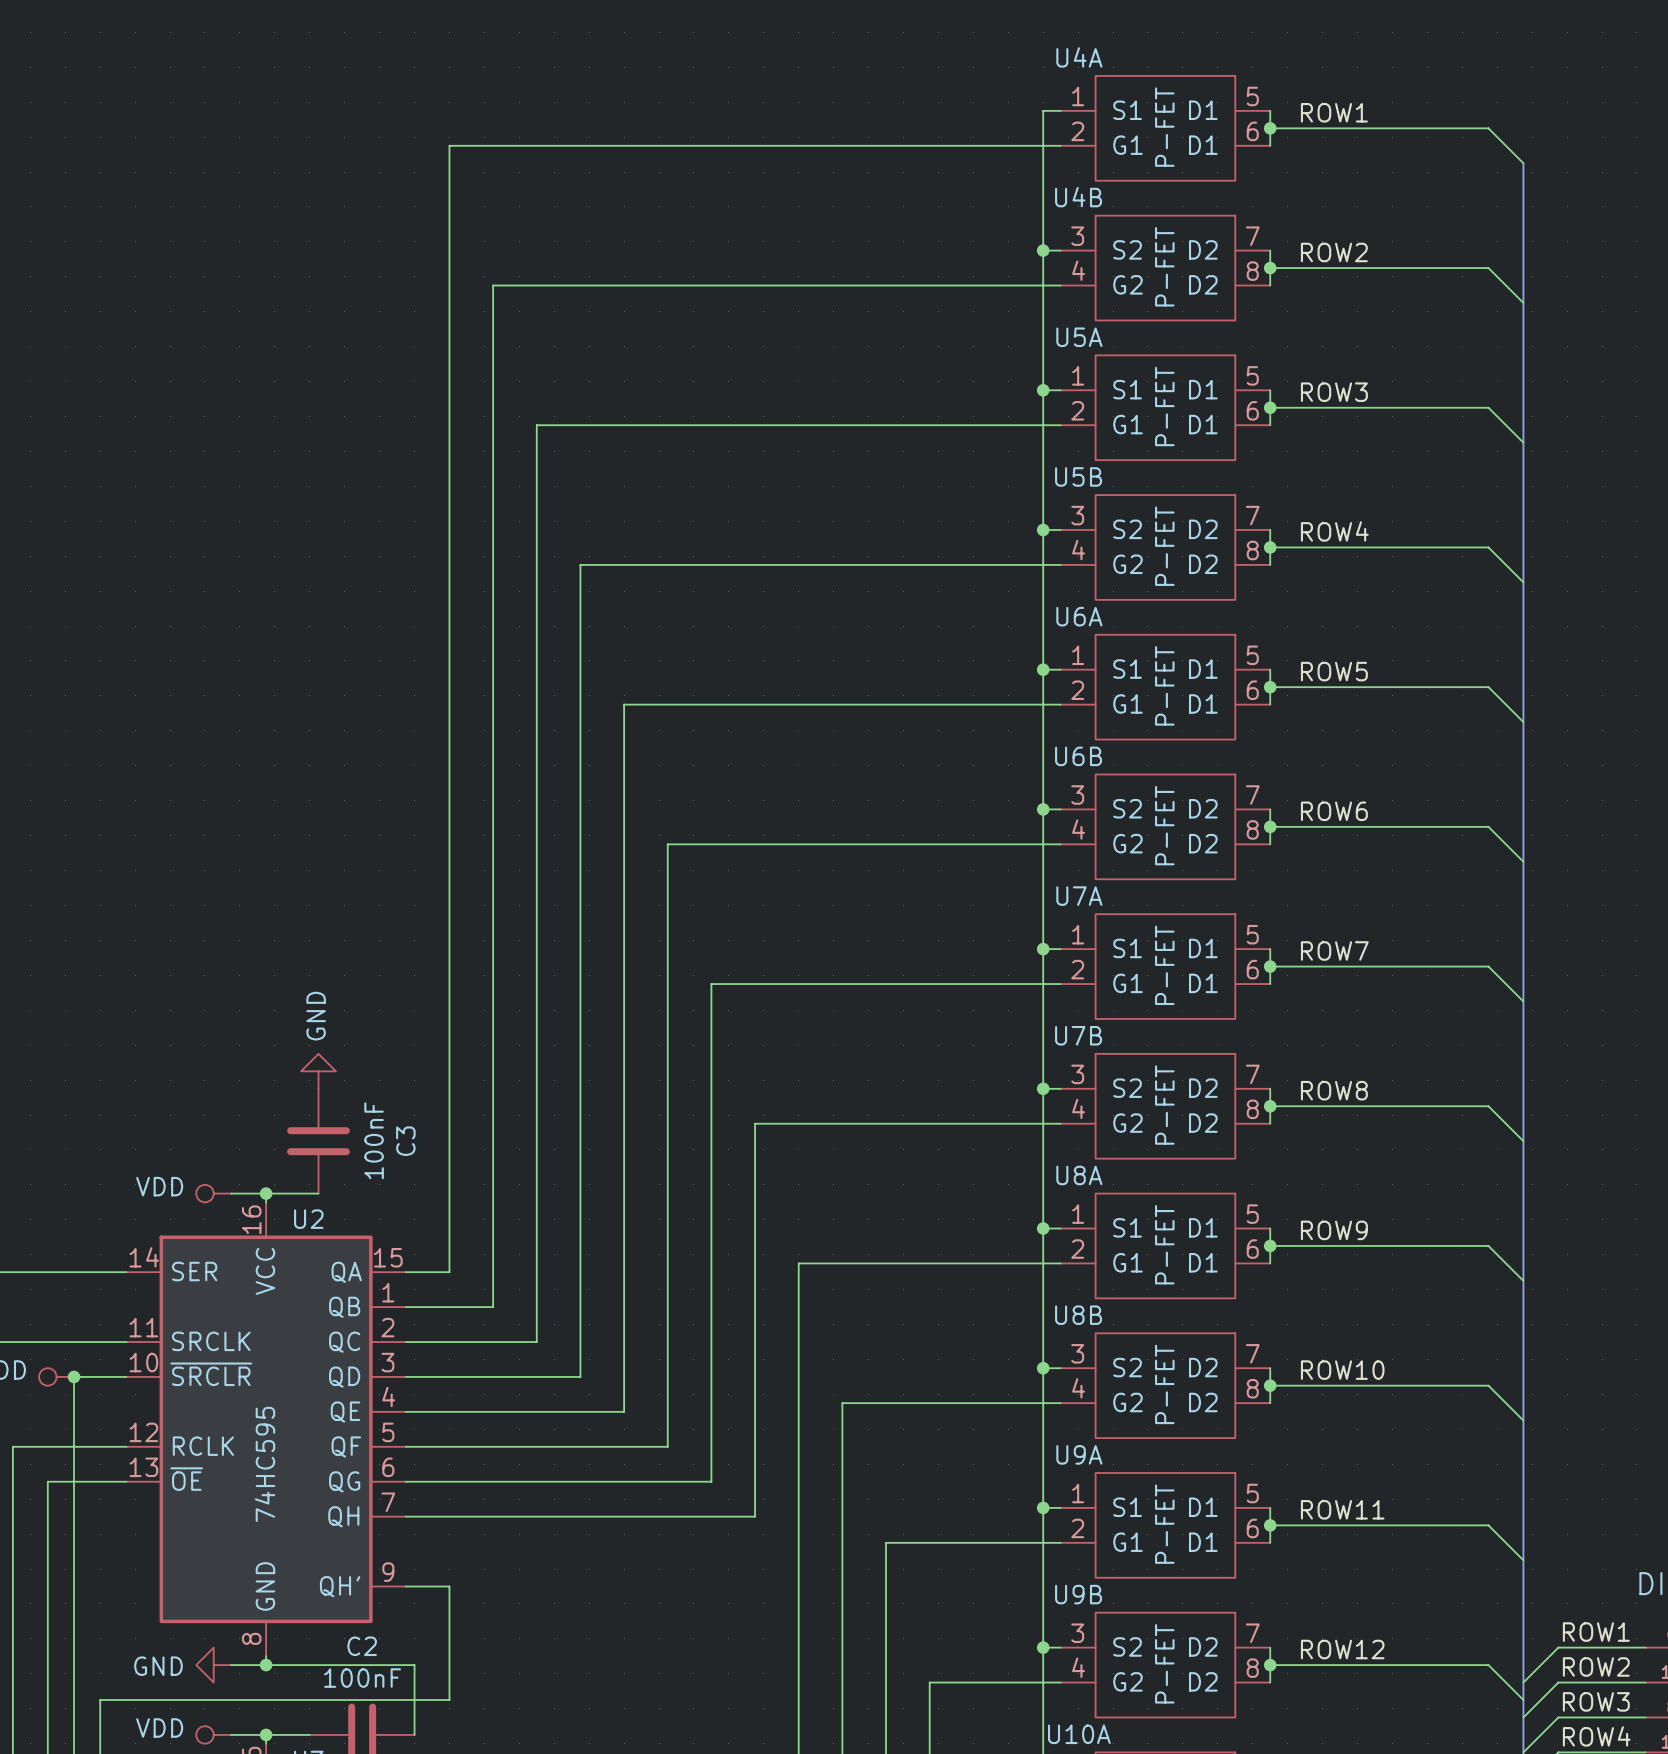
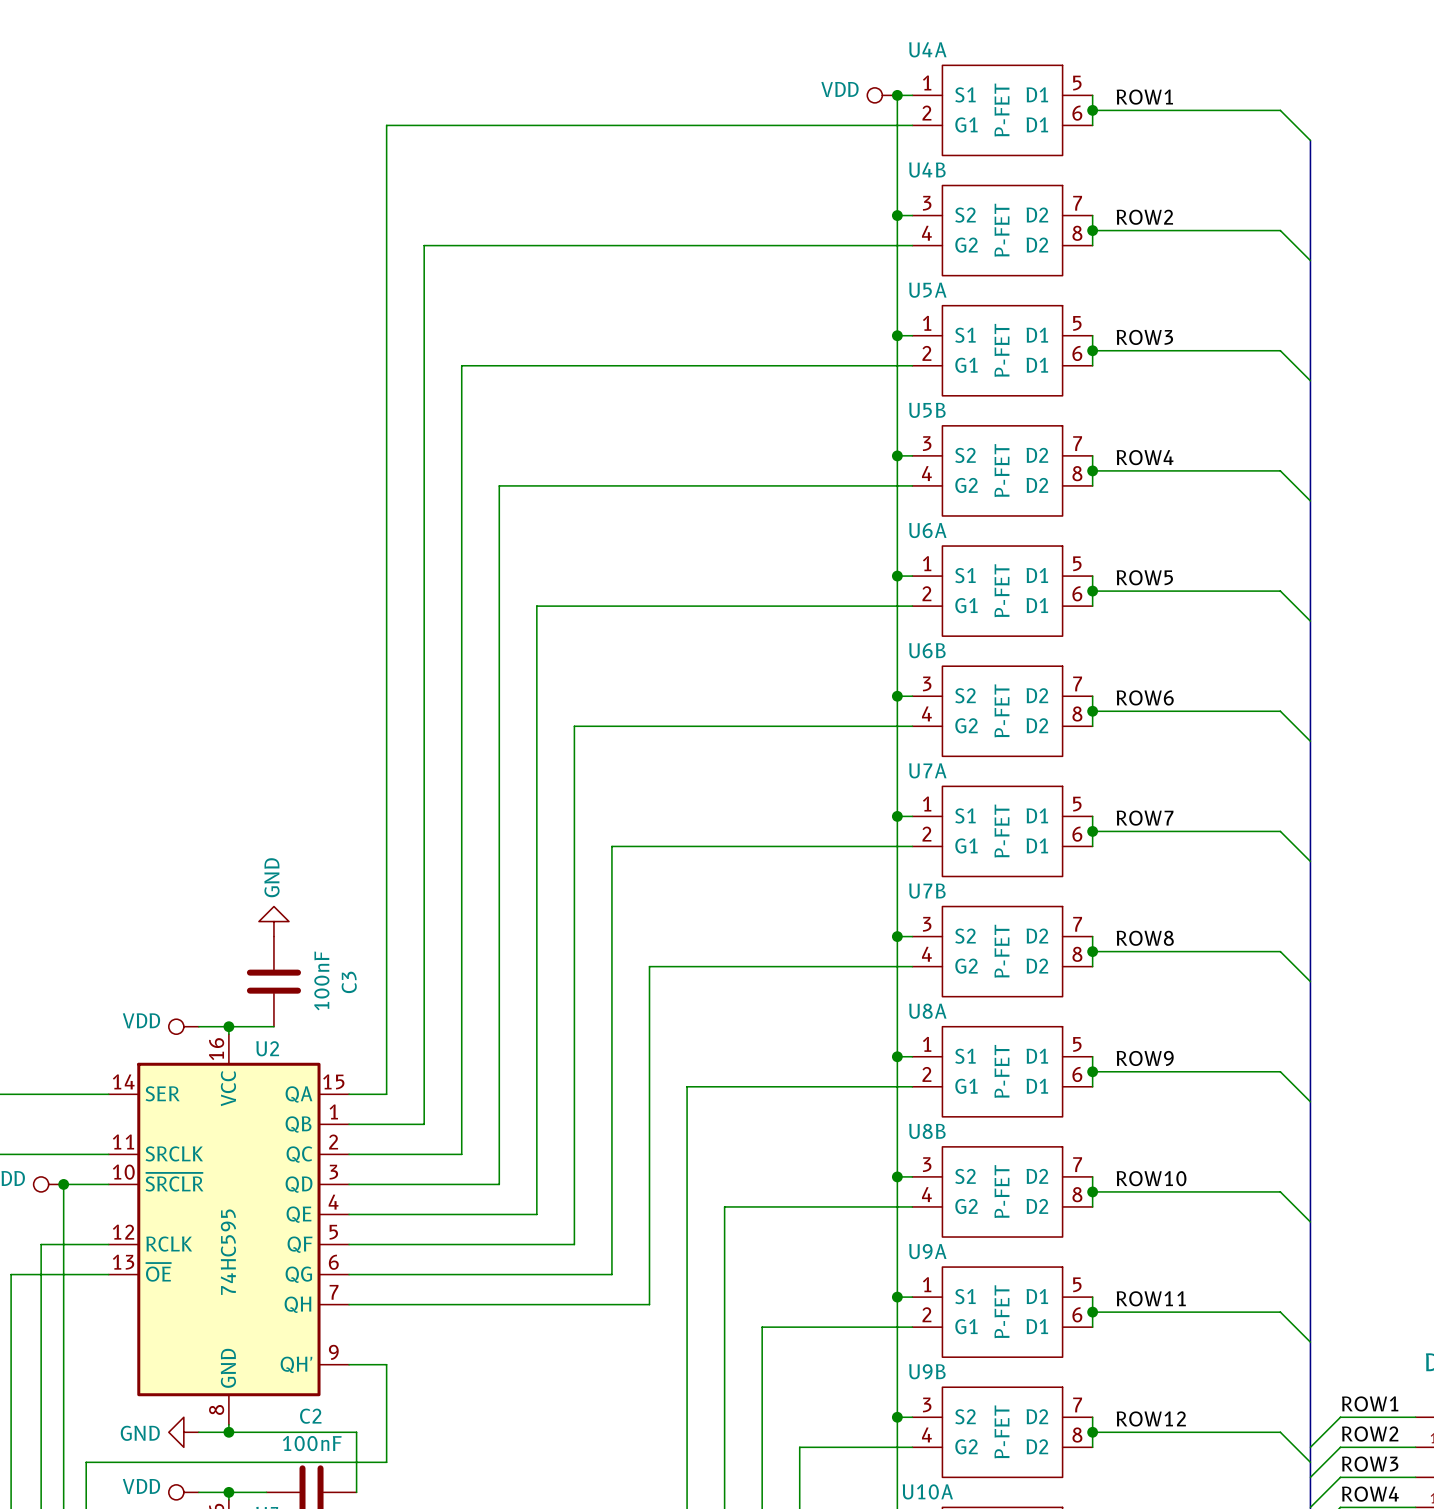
power symbol: none -> VDD (882, 95)
junction: none -> (897, 95)
wire: (47, 1446) (12, 1446) (12, 1481) -> (41, 1244) (41, 1274) (11, 1274)

